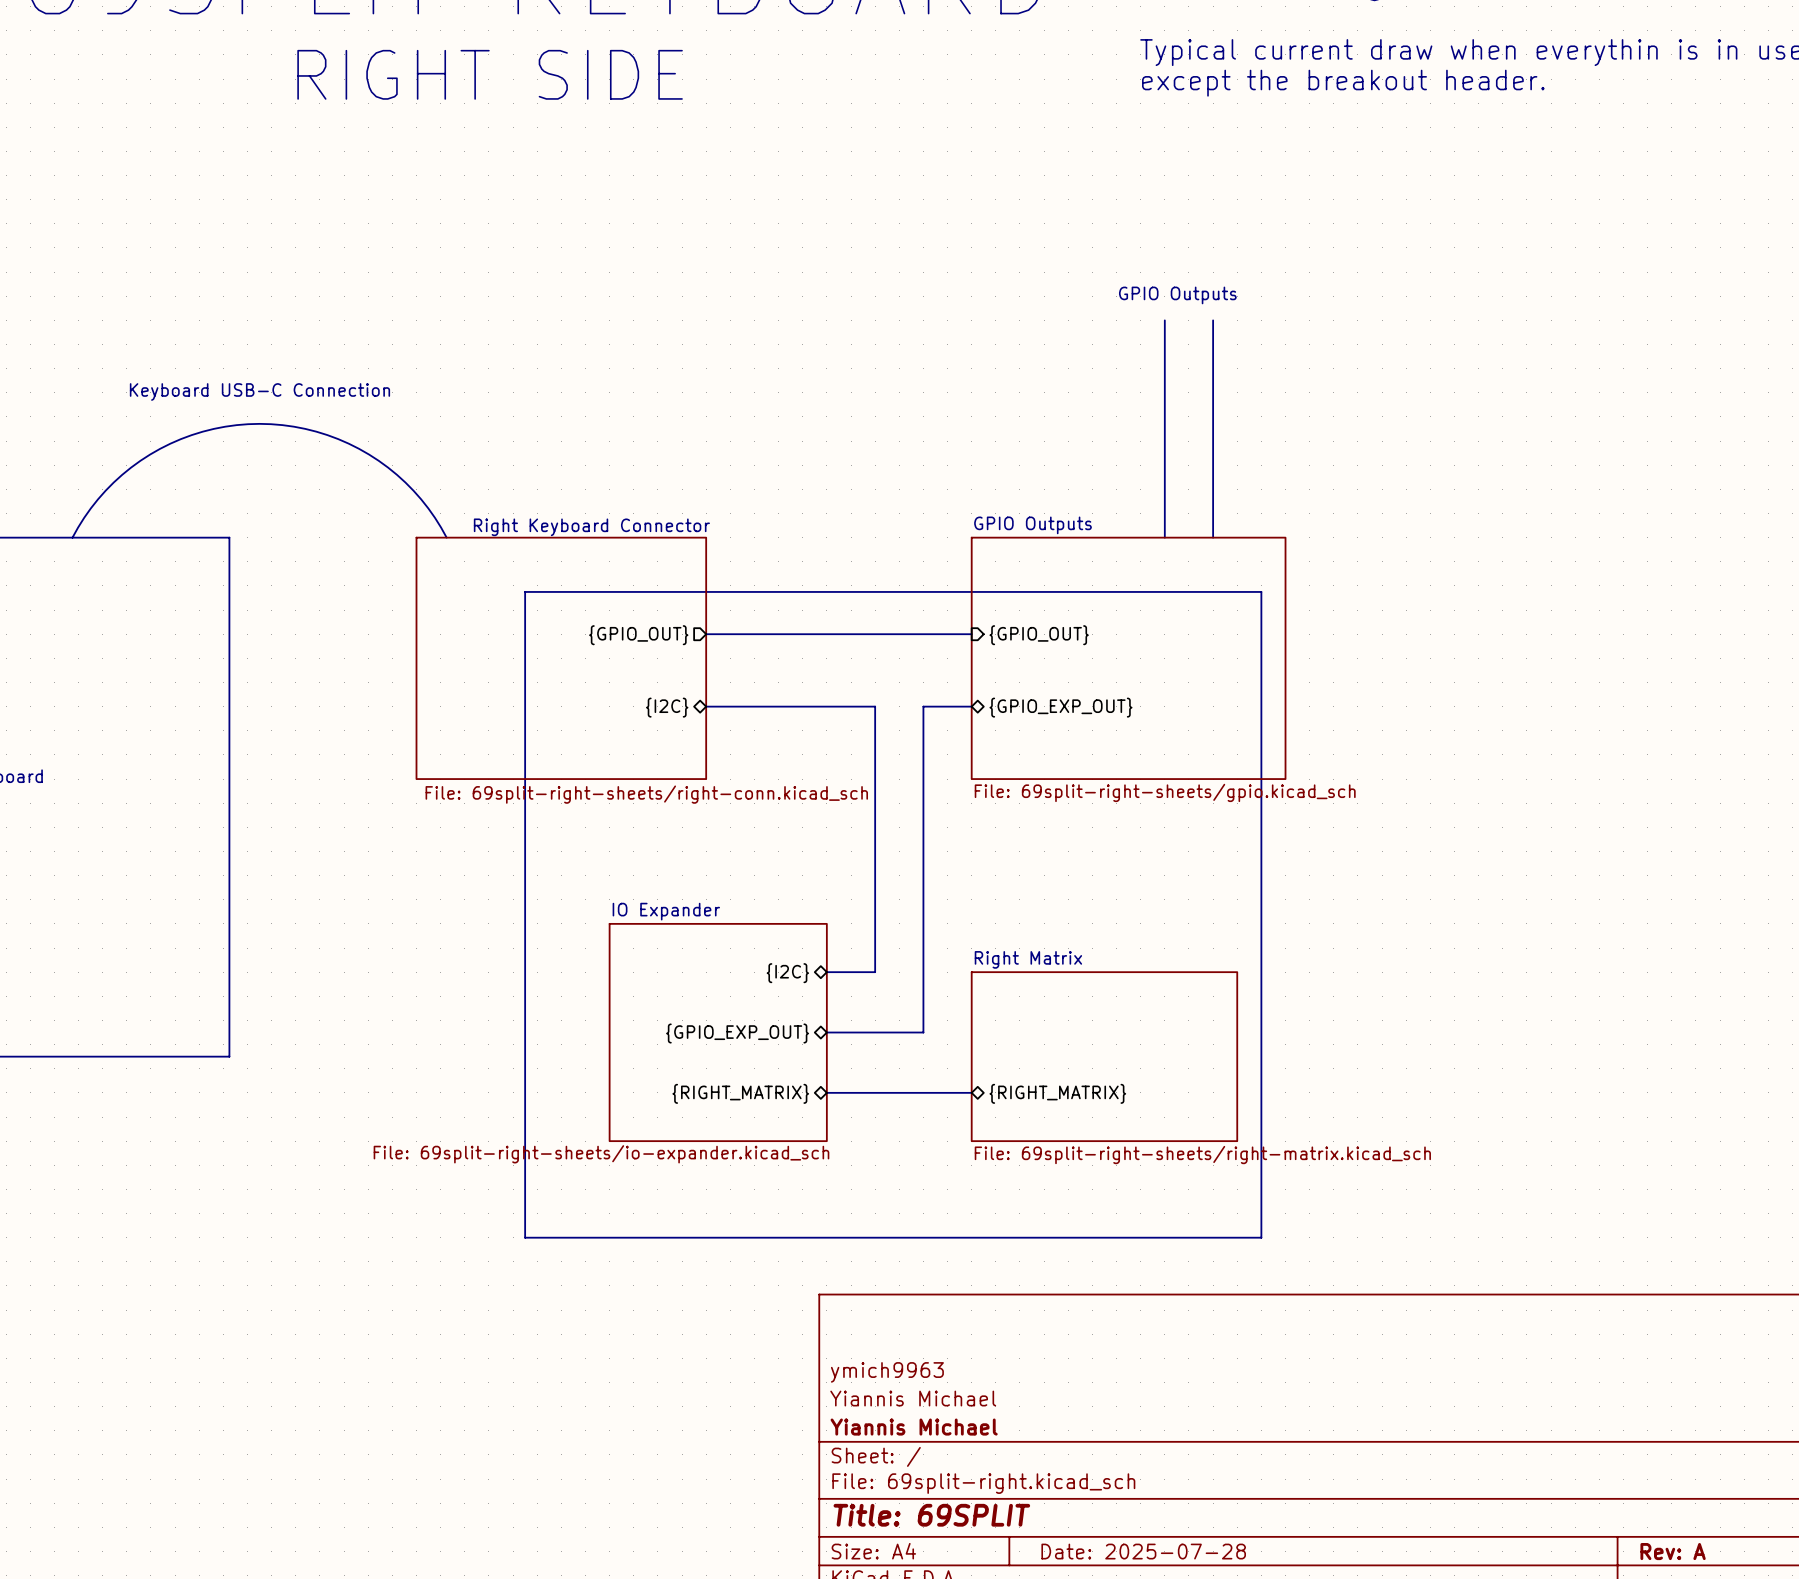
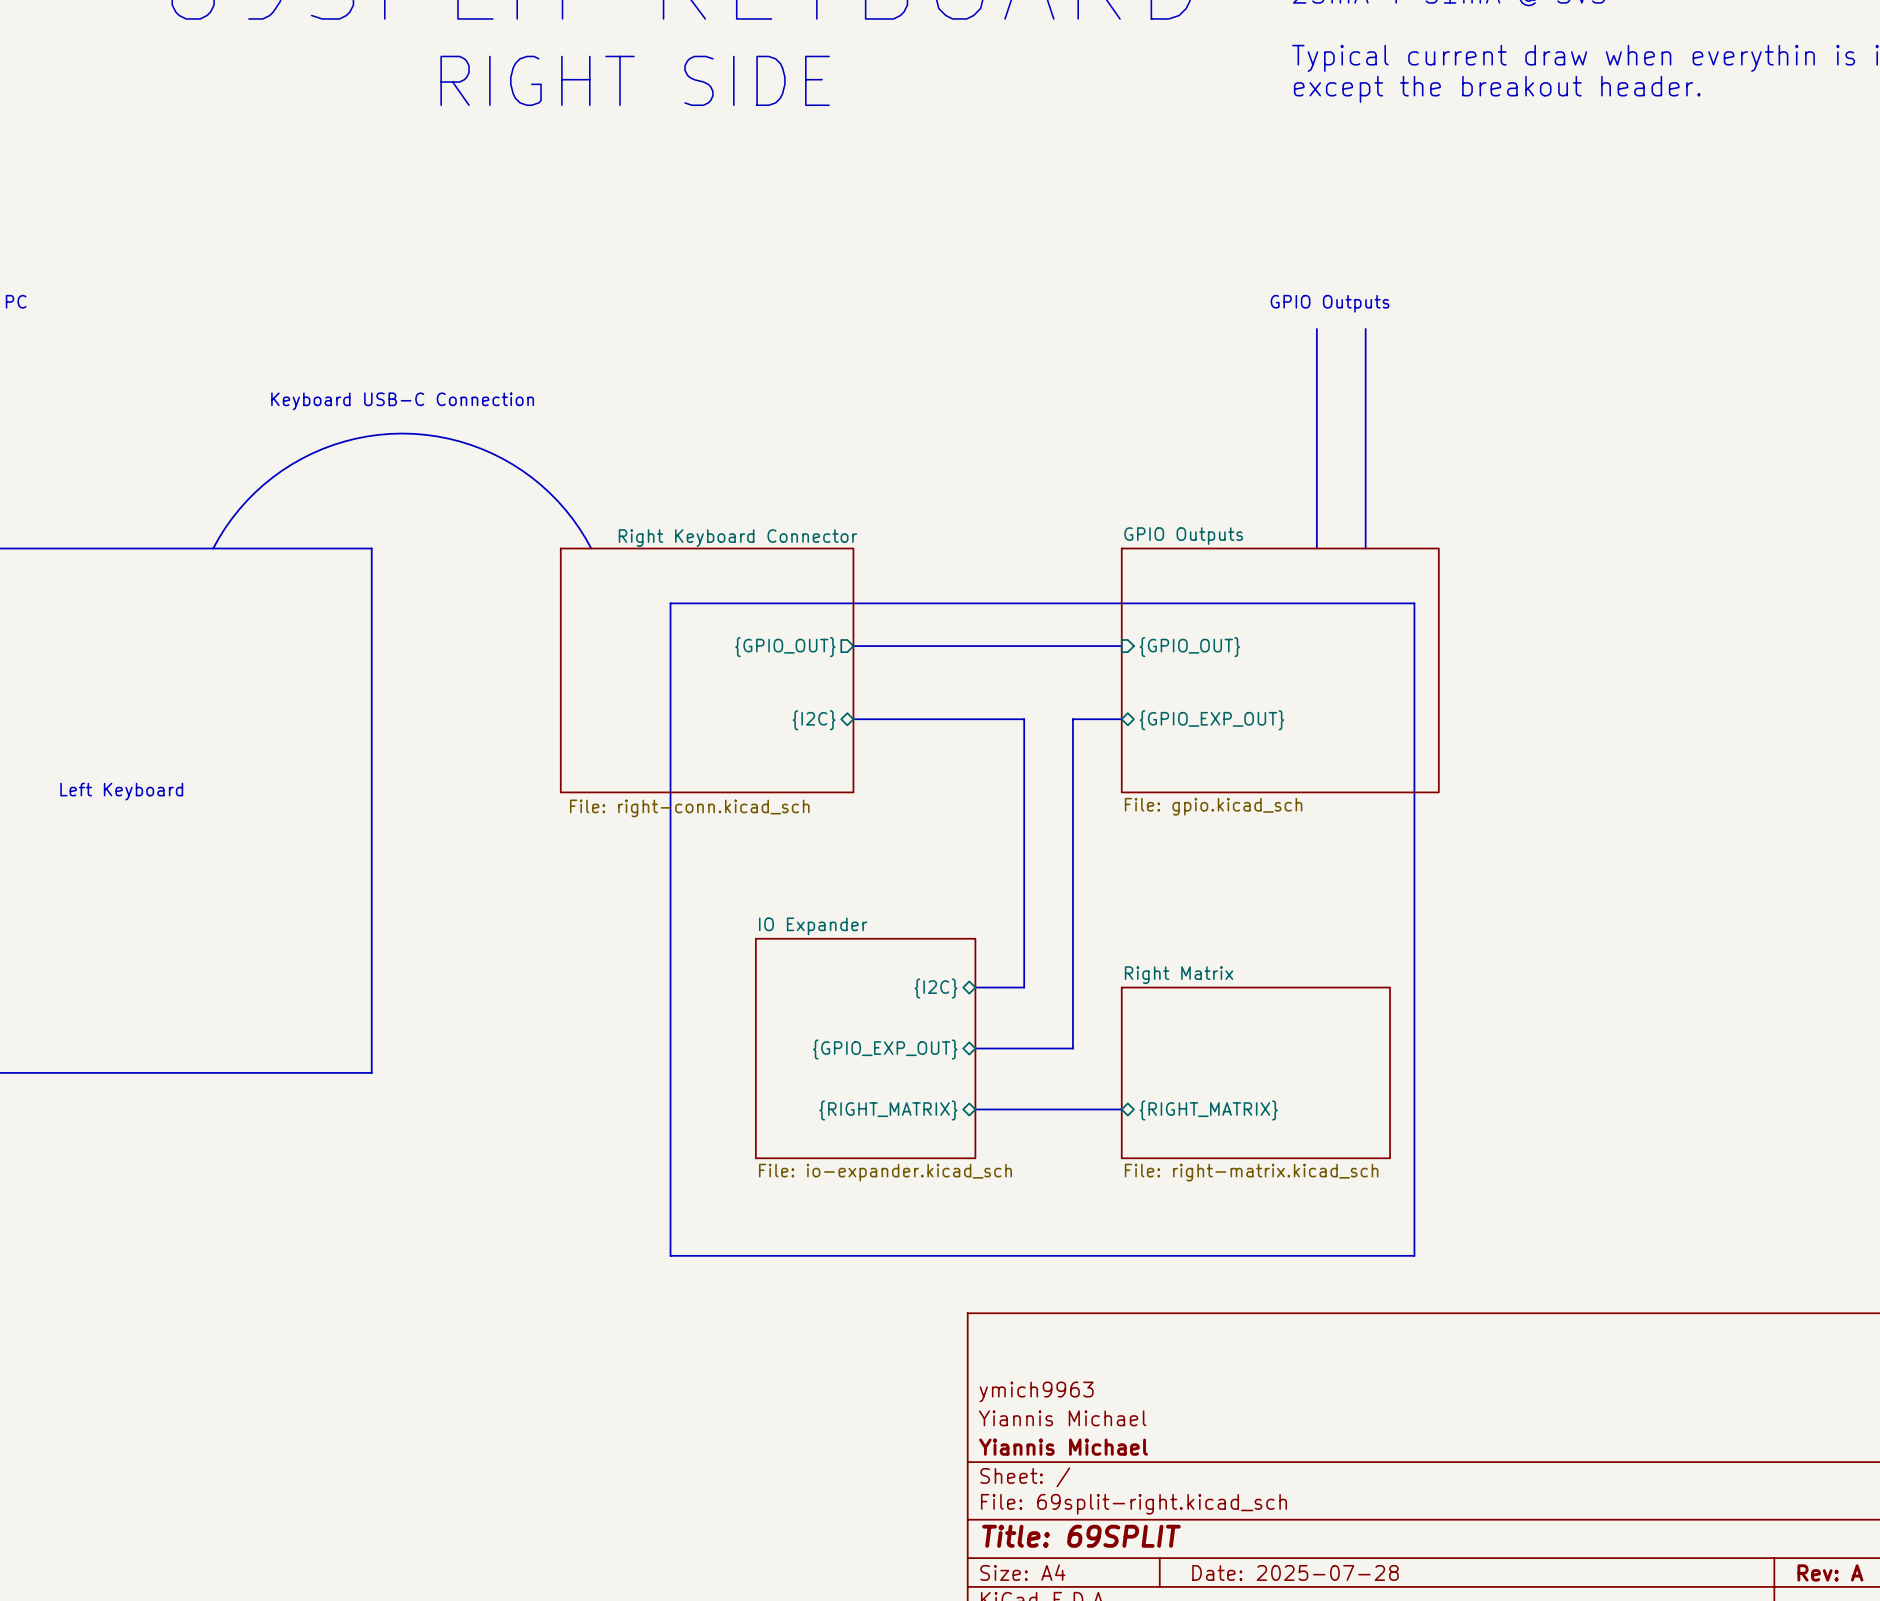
sheet GPIO Outputs value: File: 69split-right-sheets/gpio.kicad_sch (1165, 792) -> File: gpio.kicad_sch (1213, 806)
sheet Right Keyboard Connector value: File: 69split-right-sheets/right-conn.kicad_sch (646, 794) -> File: right-conn.kicad_sch (689, 808)
sheet IO Expander value: File: 69split-right-sheets/io-expander.kicad_sch (601, 1154) -> File: io-expander.kicad_sch (885, 1172)
sheet Right Matrix value: File: 69split-right-sheets/right-matrix.kicad_sch (1202, 1155) -> File: right-matrix.kicad_sch (1251, 1172)

